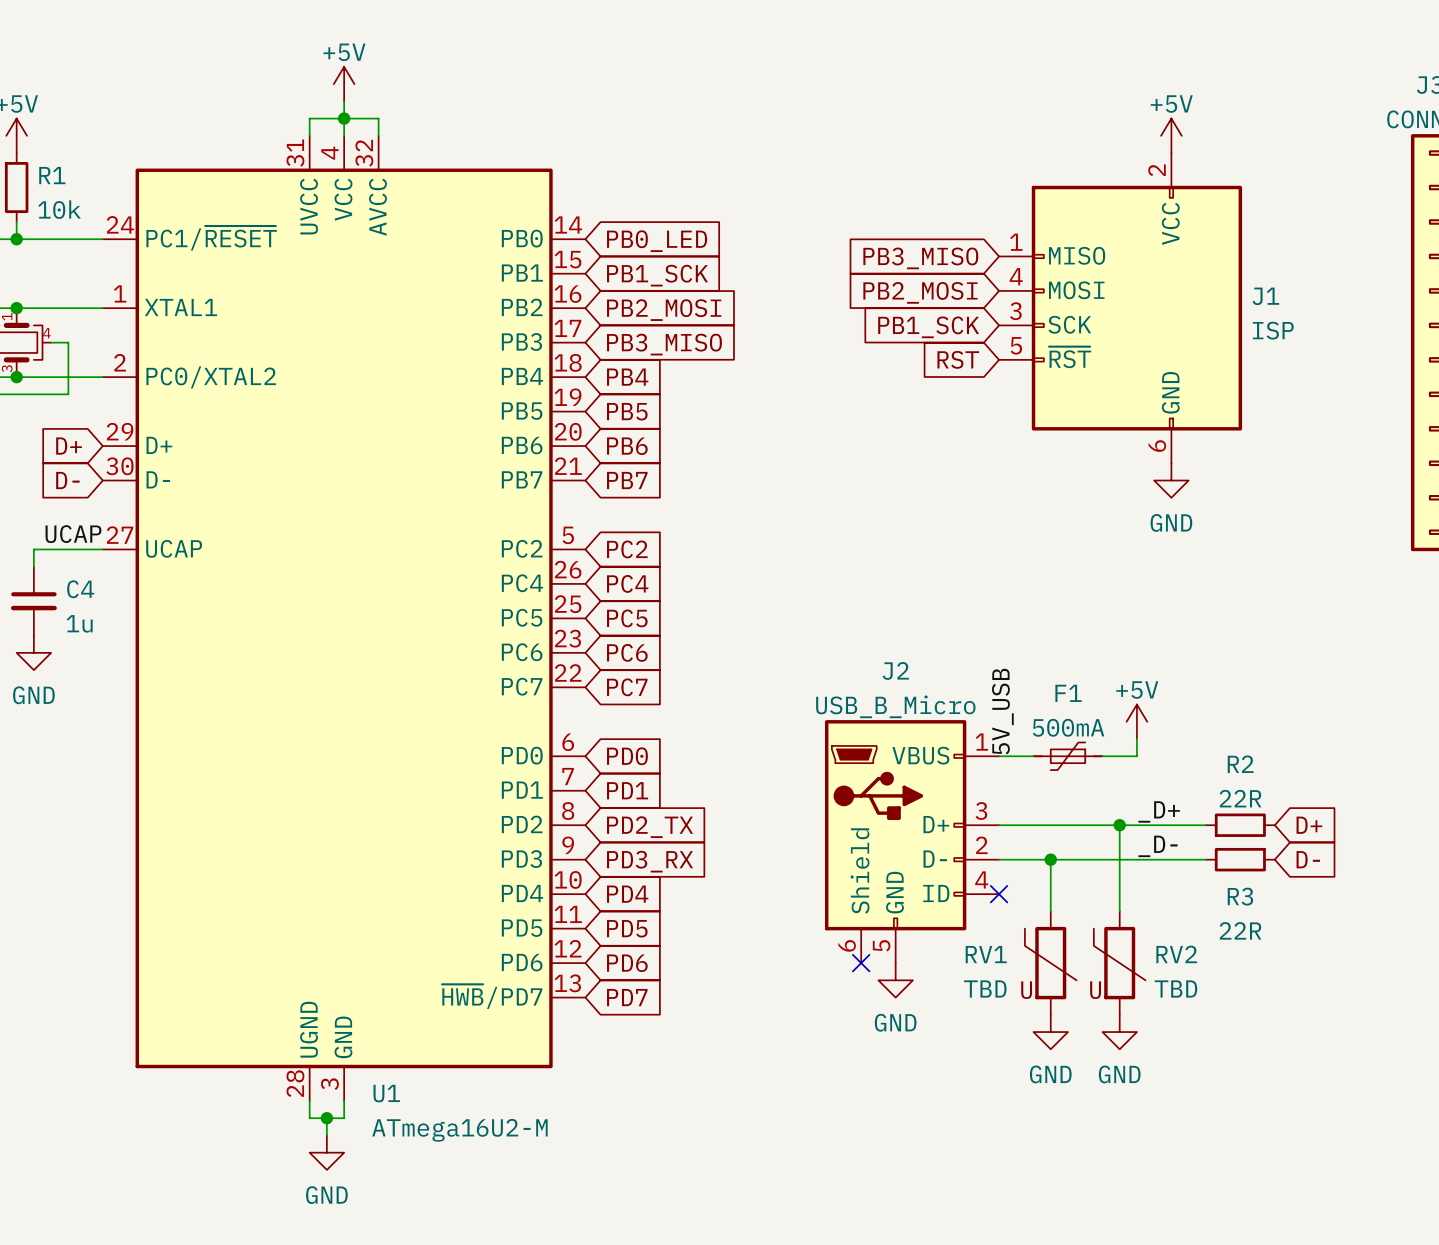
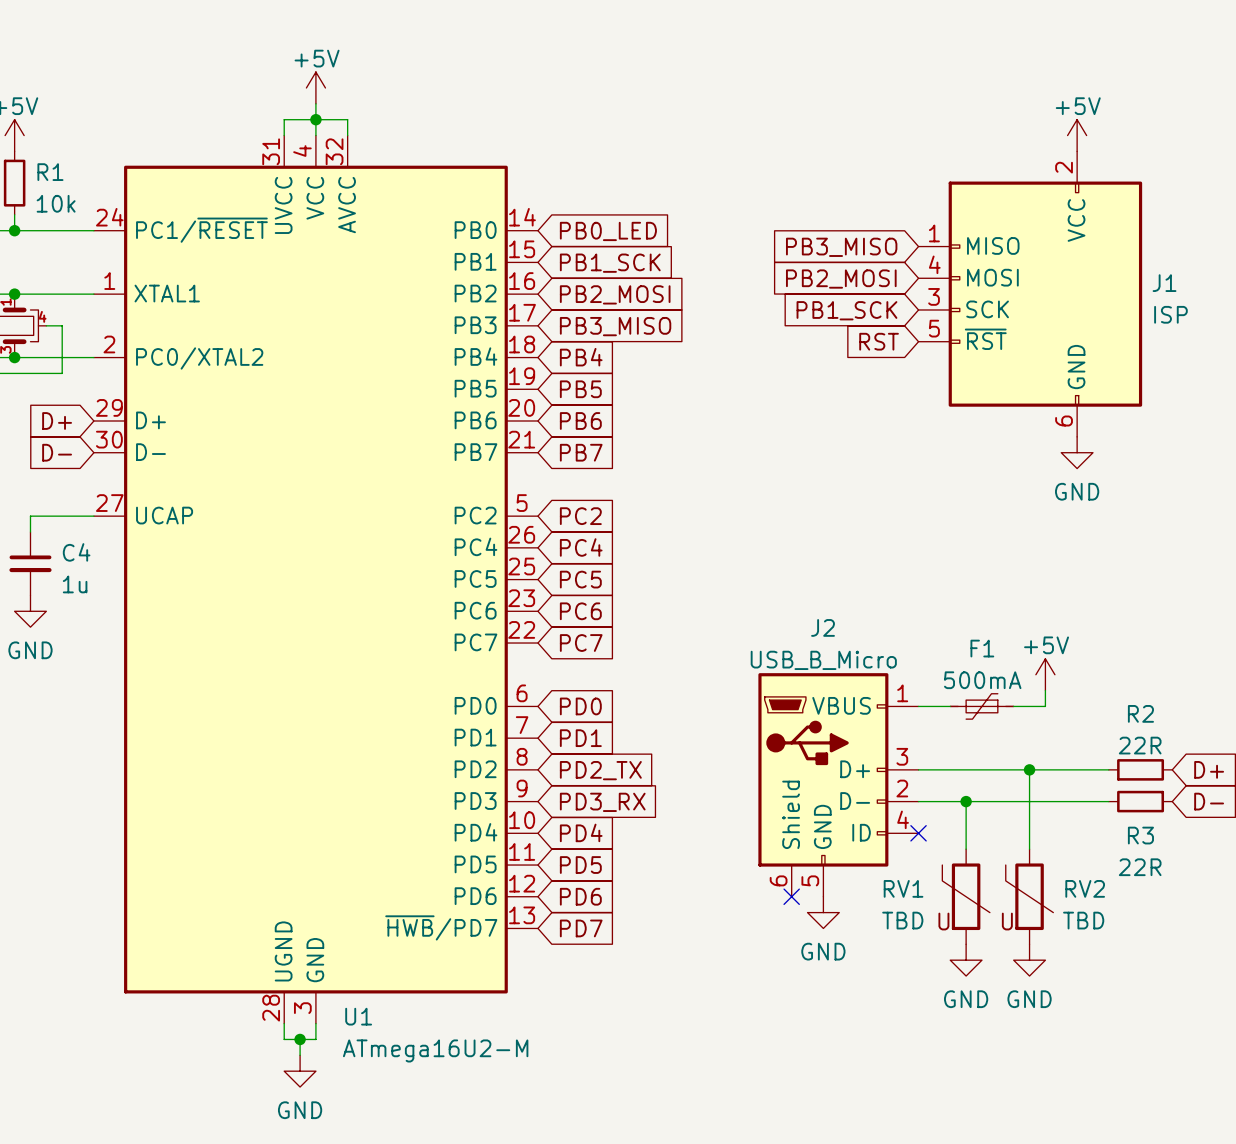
label: UCAP (73, 534) -> none
label: 5V_USB (1002, 711) -> none
label: _D+ (1159, 811) -> none
label: _D- (1157, 846) -> none

